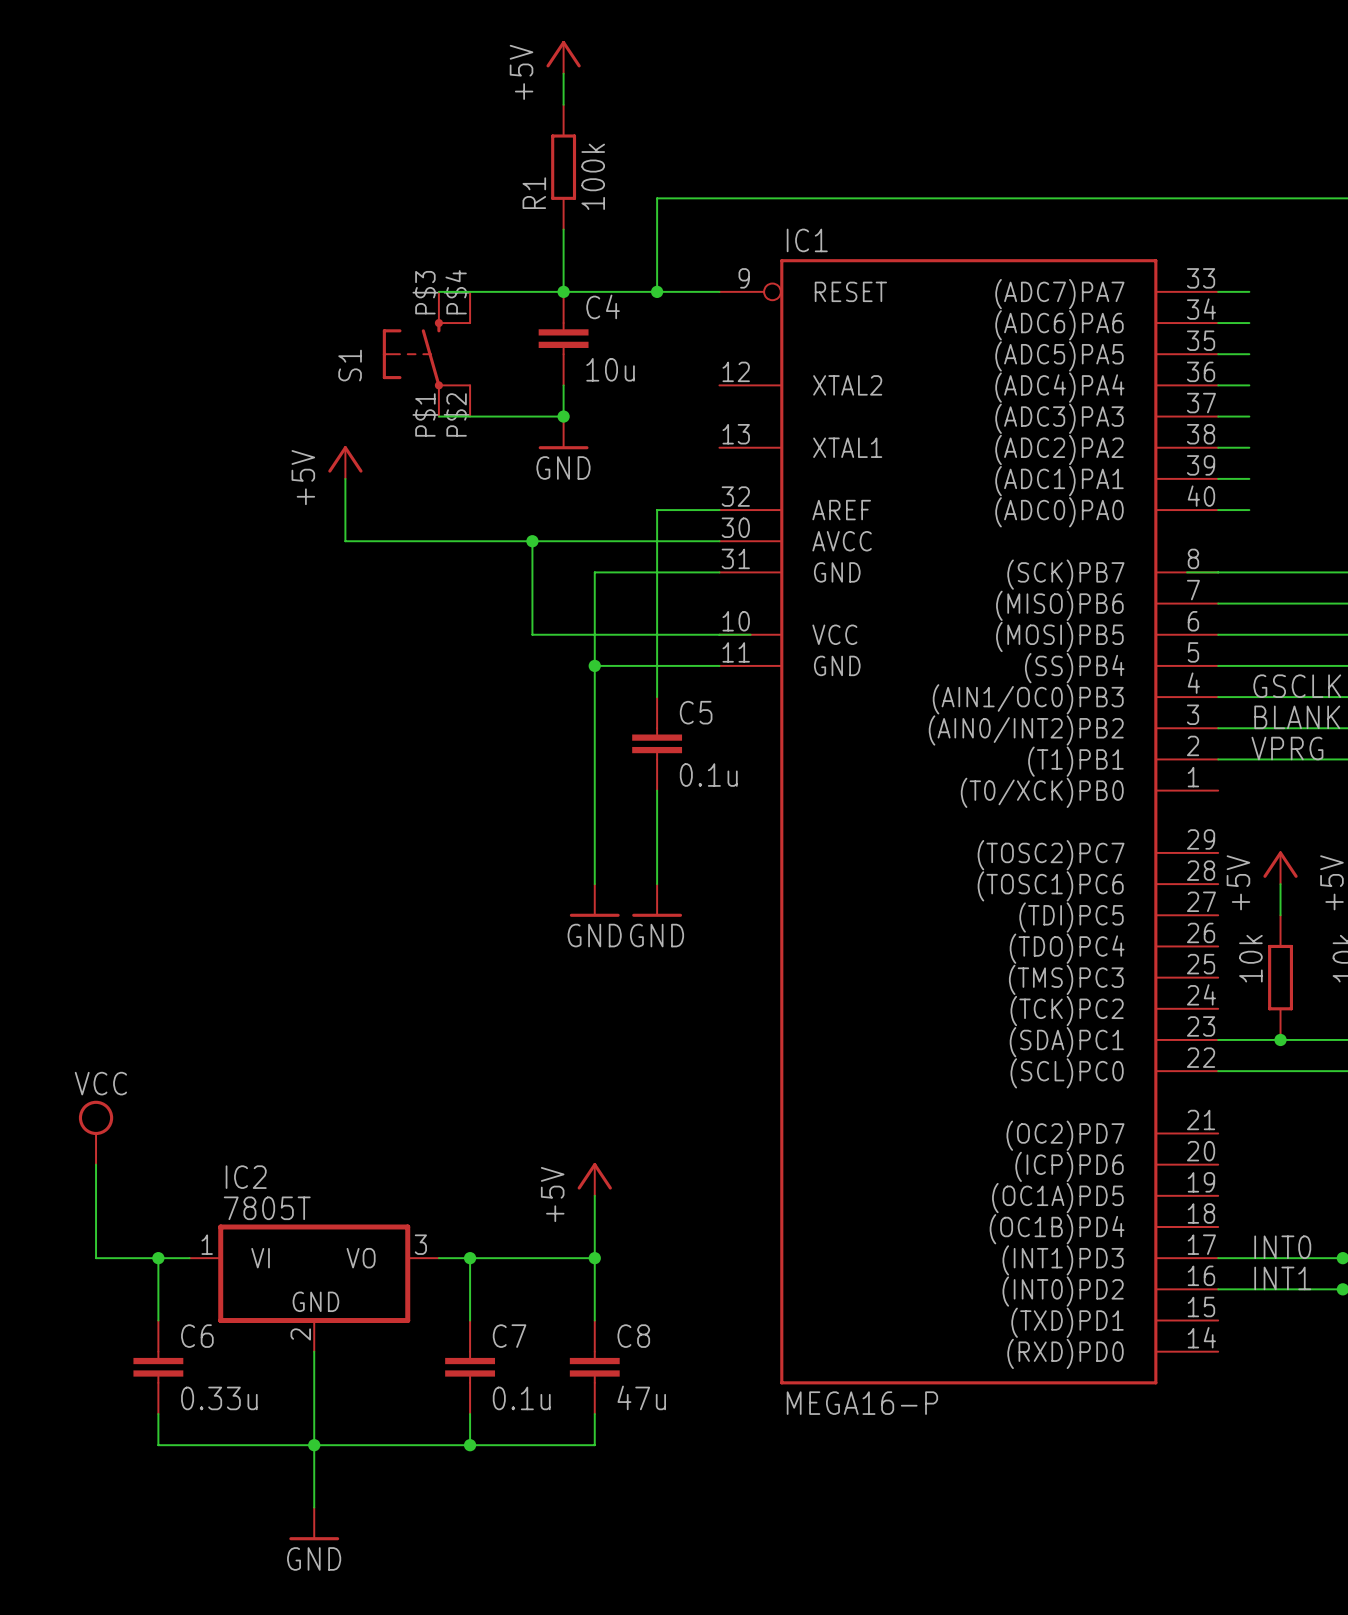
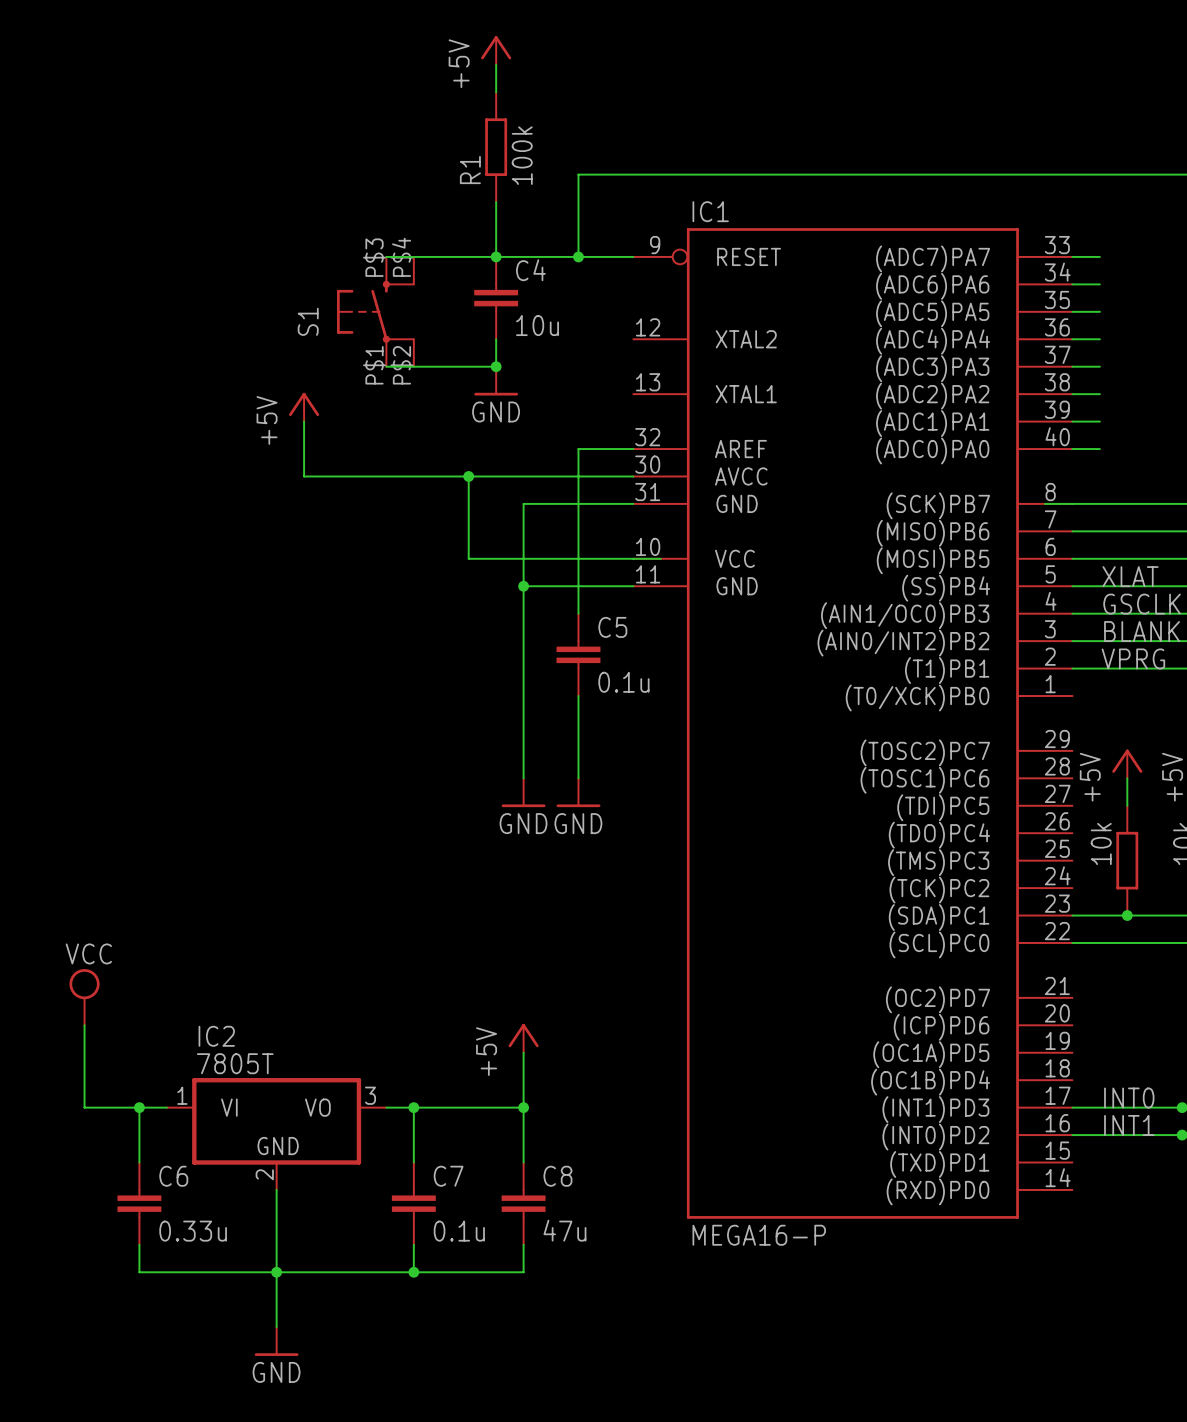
label: none -> XLAT (1130, 576)

